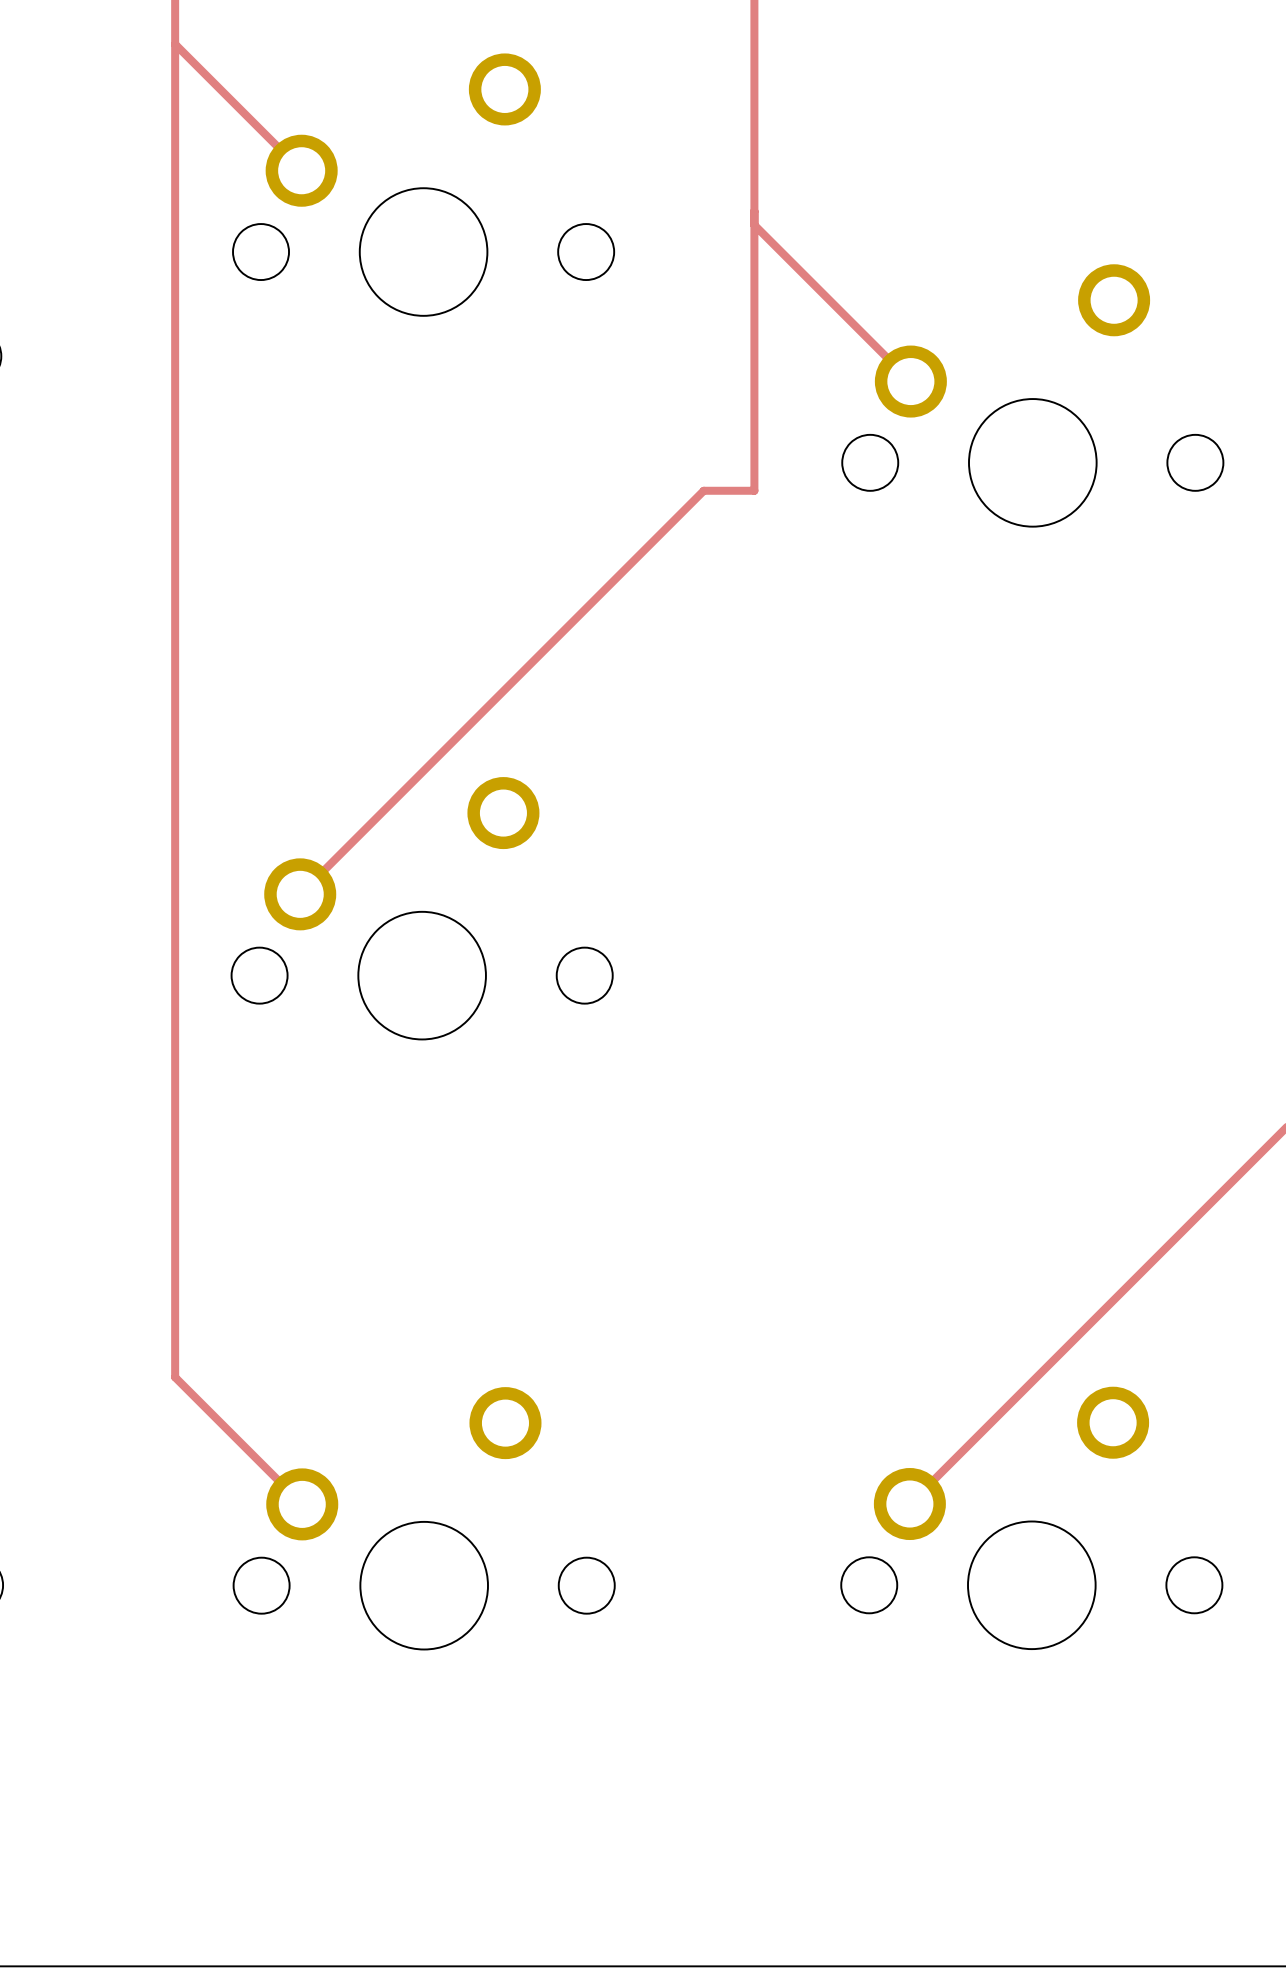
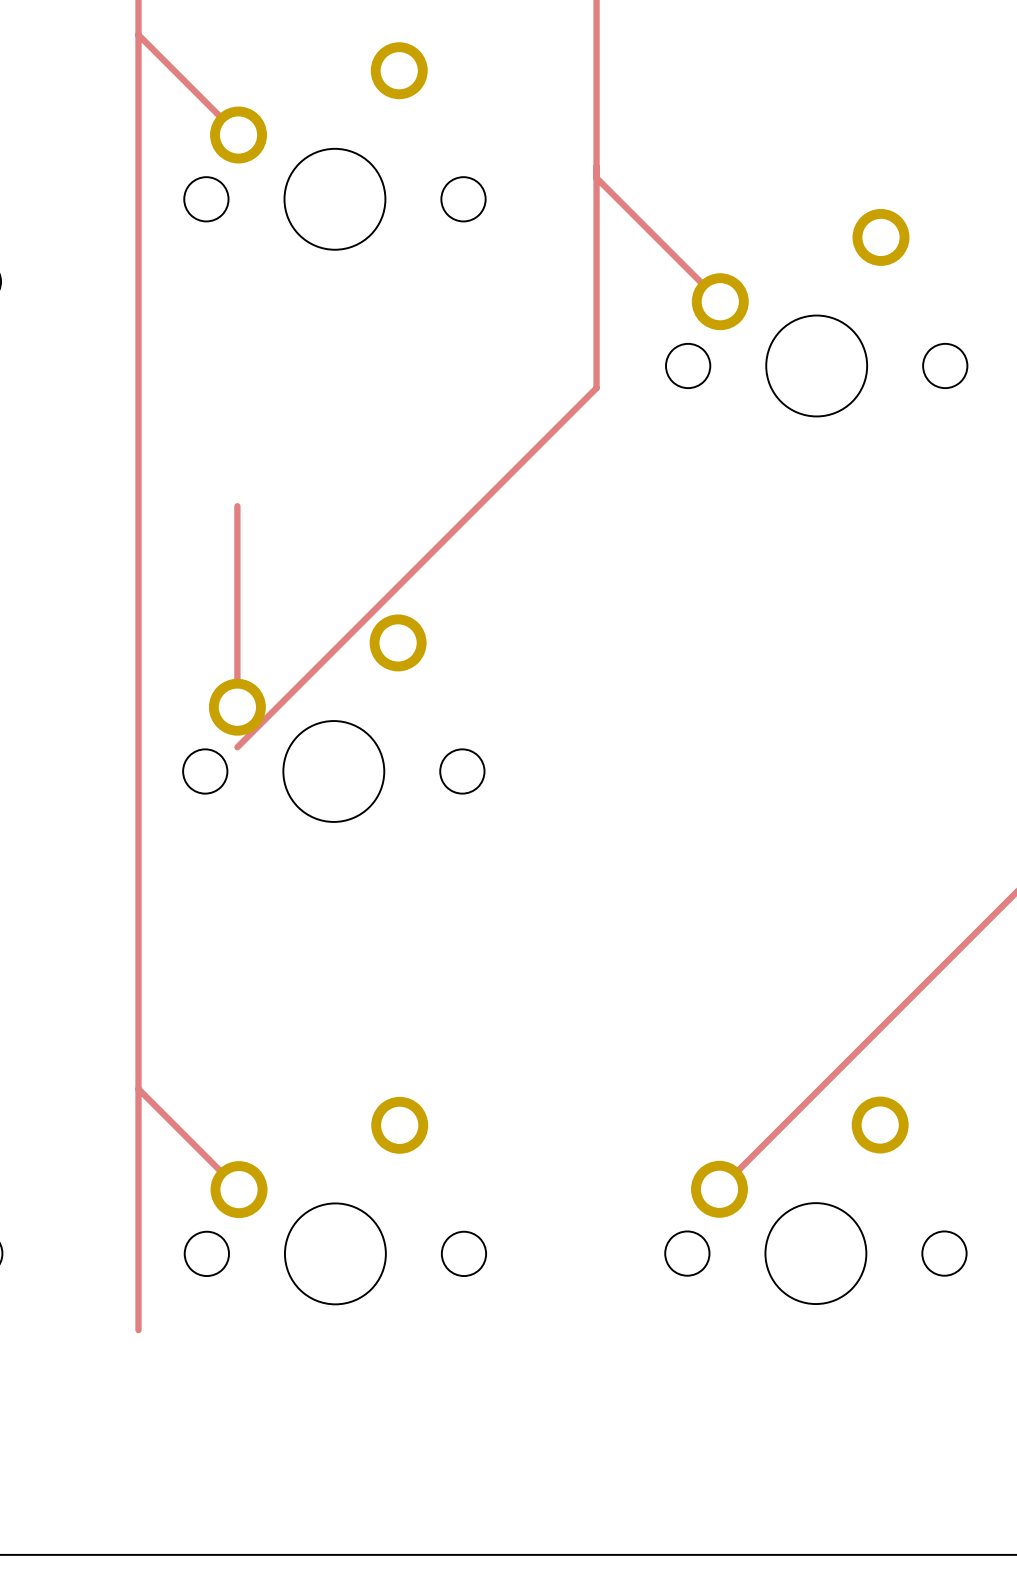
track: (754, 490) (703, 490) (300, 894) -> (596, 388) (237, 747)
track: none -> (237, 506) (237, 707)
track: none -> (138, 1089) (138, 1330)

